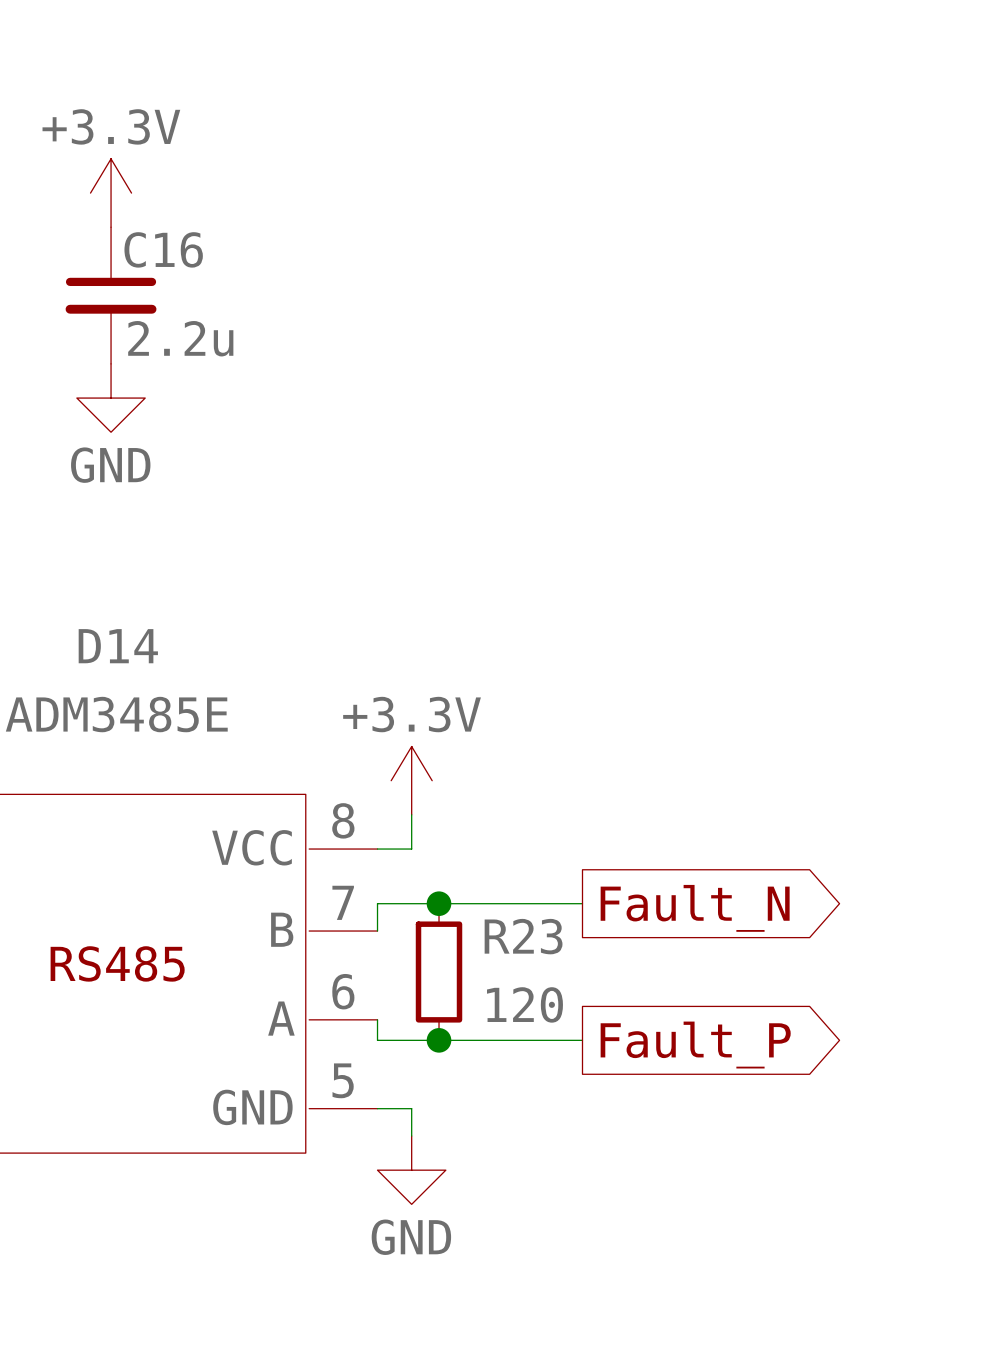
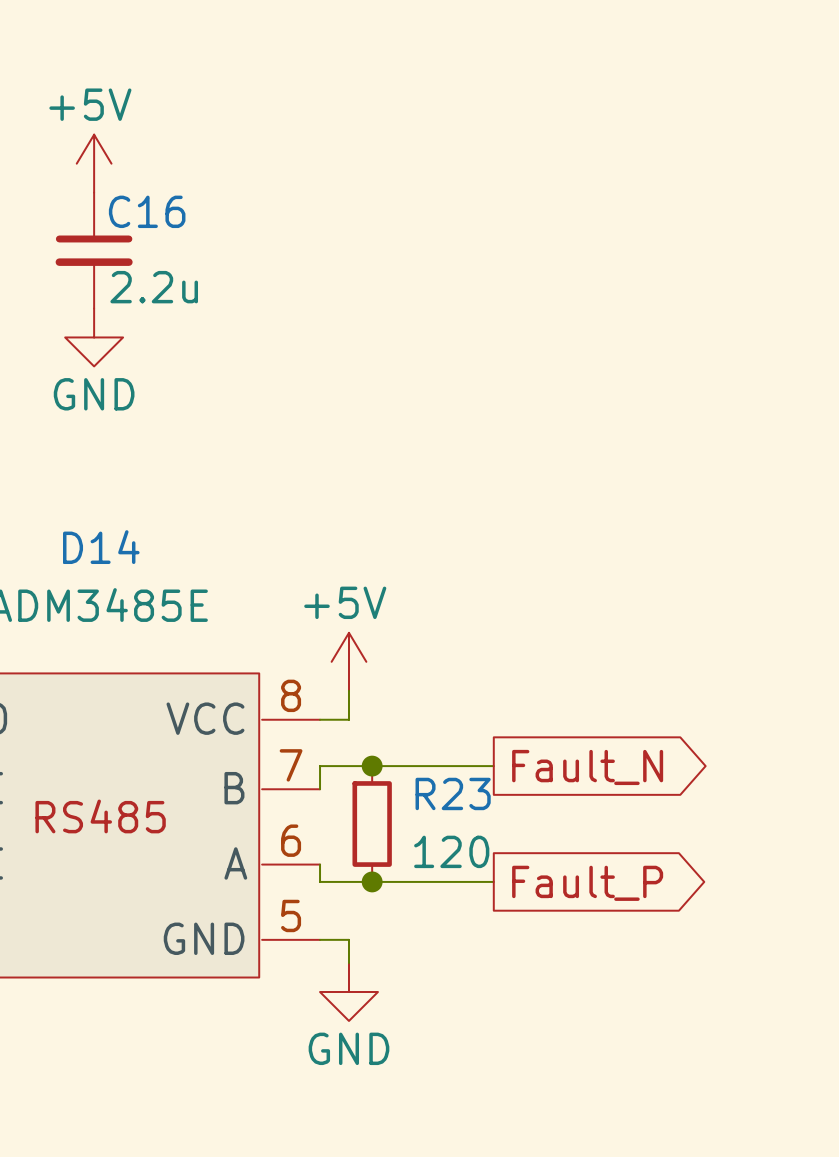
power symbol: +3.3V (111, 193) -> +5V (94, 163)
power symbol: +3.3V (411, 780) -> +5V (348, 661)

